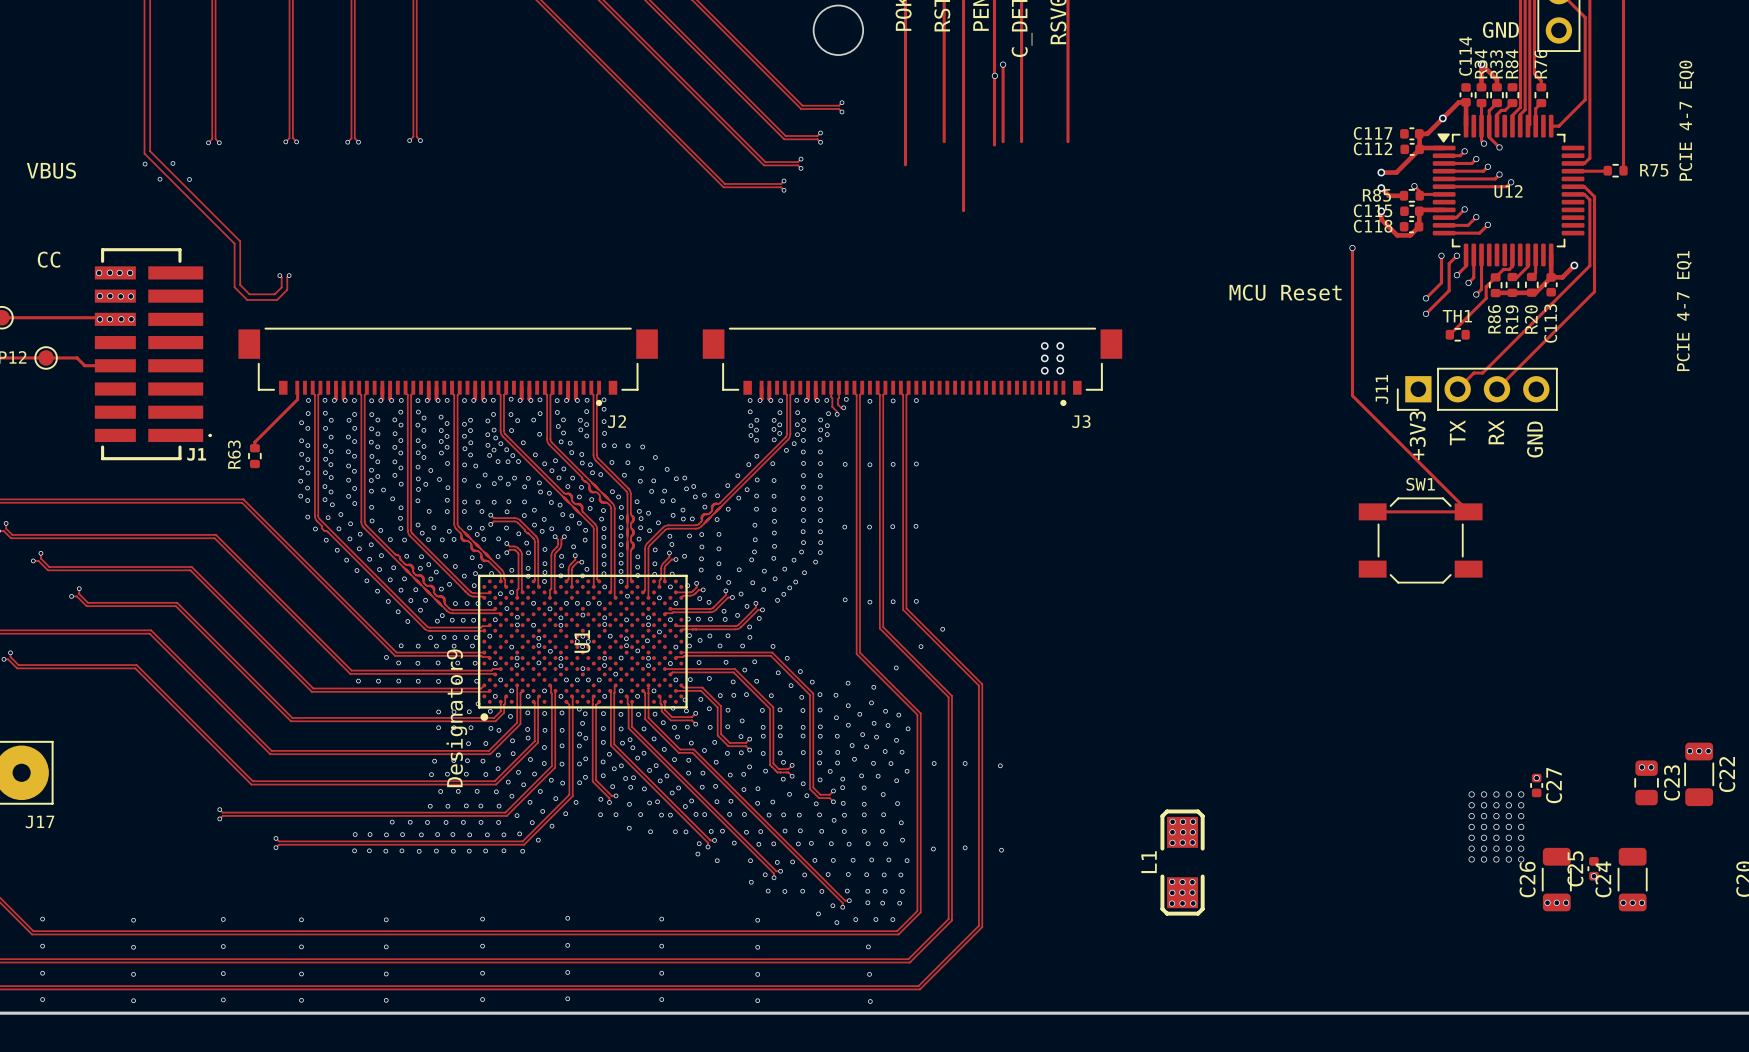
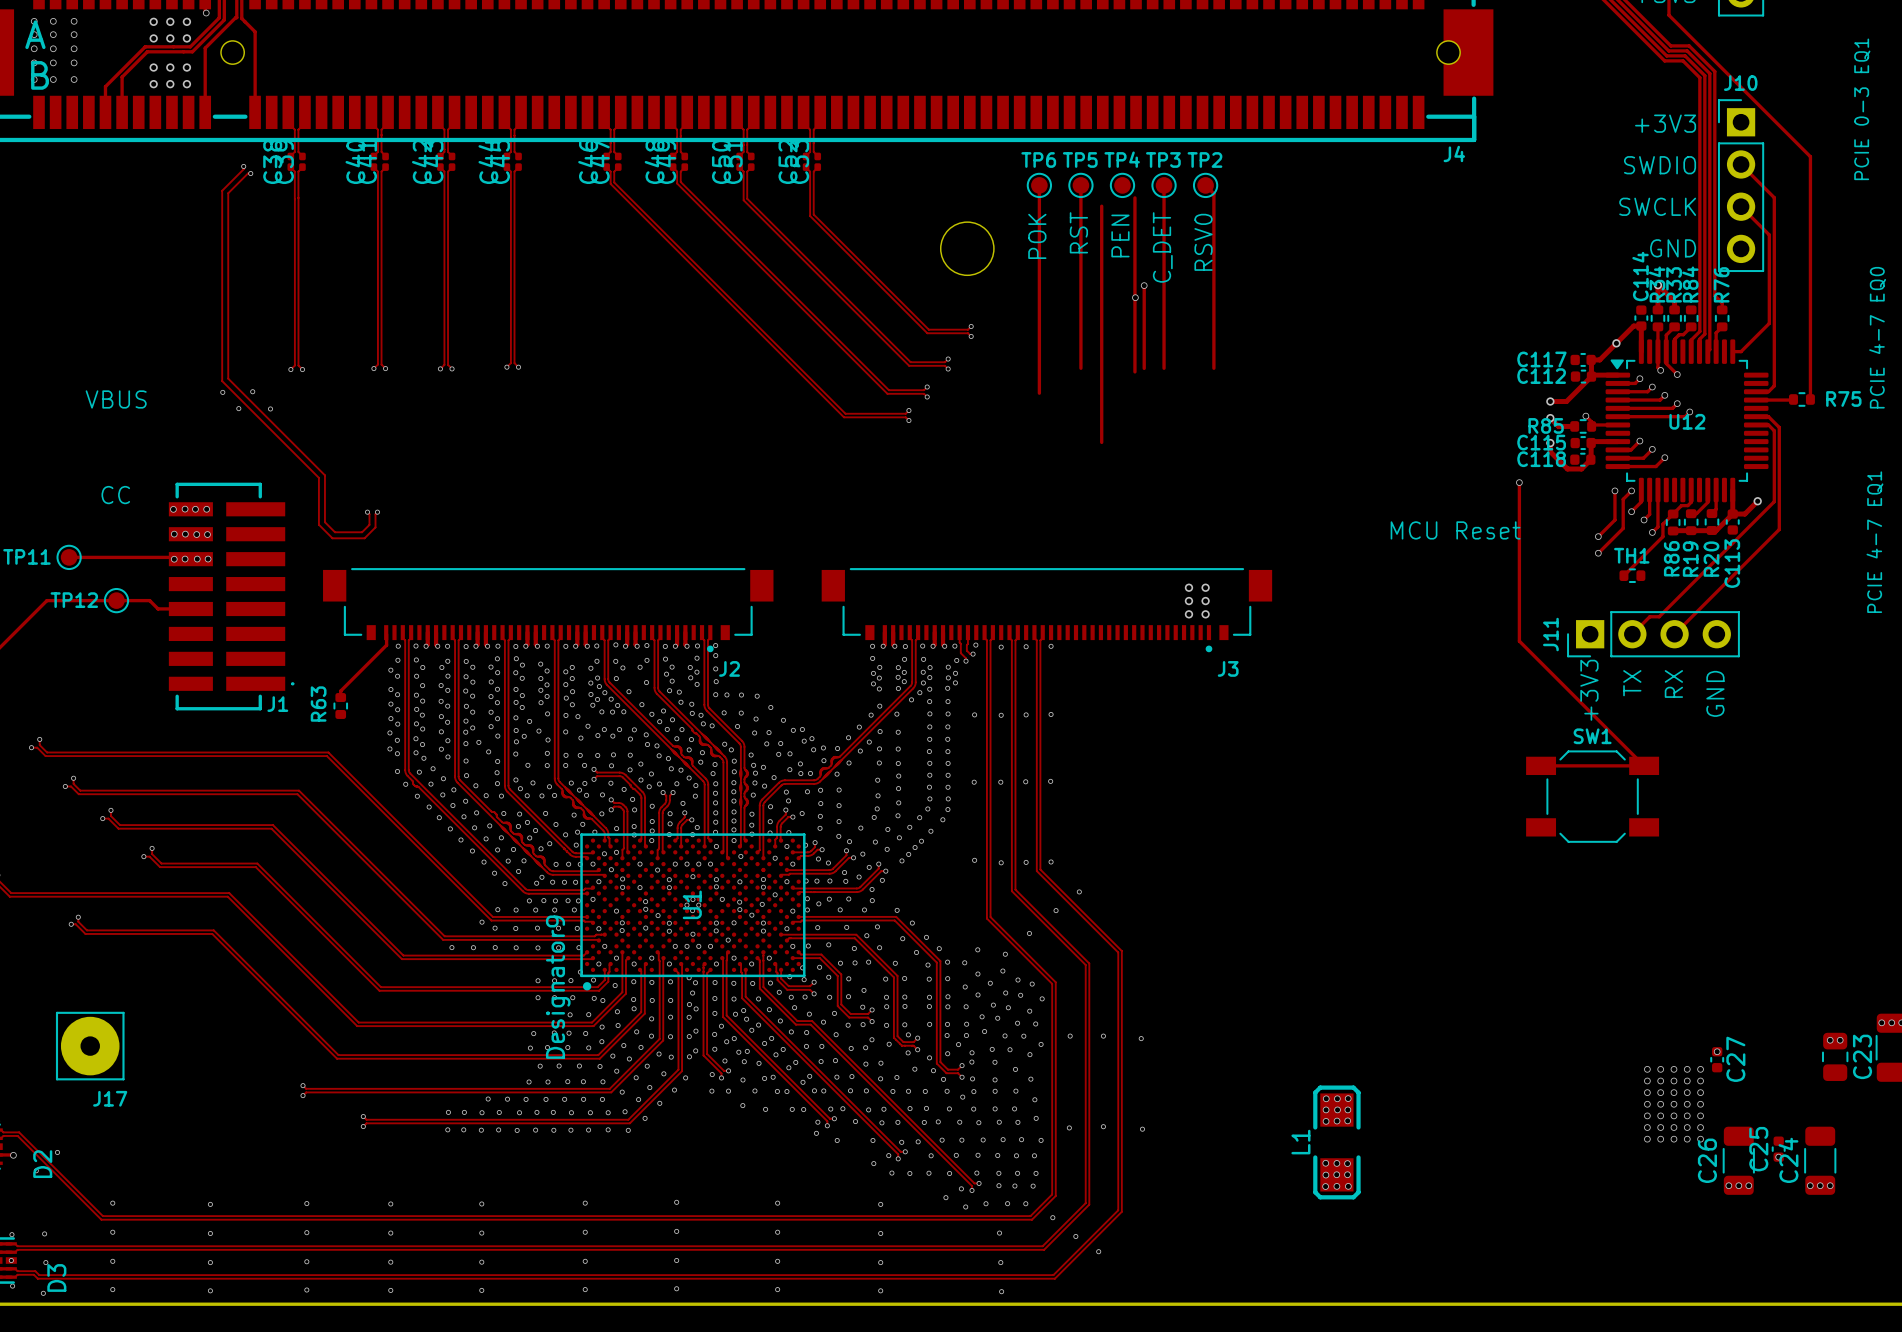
via: none -> (1052, 1217)
via: none -> (1075, 1236)
via: none -> (1098, 1251)

